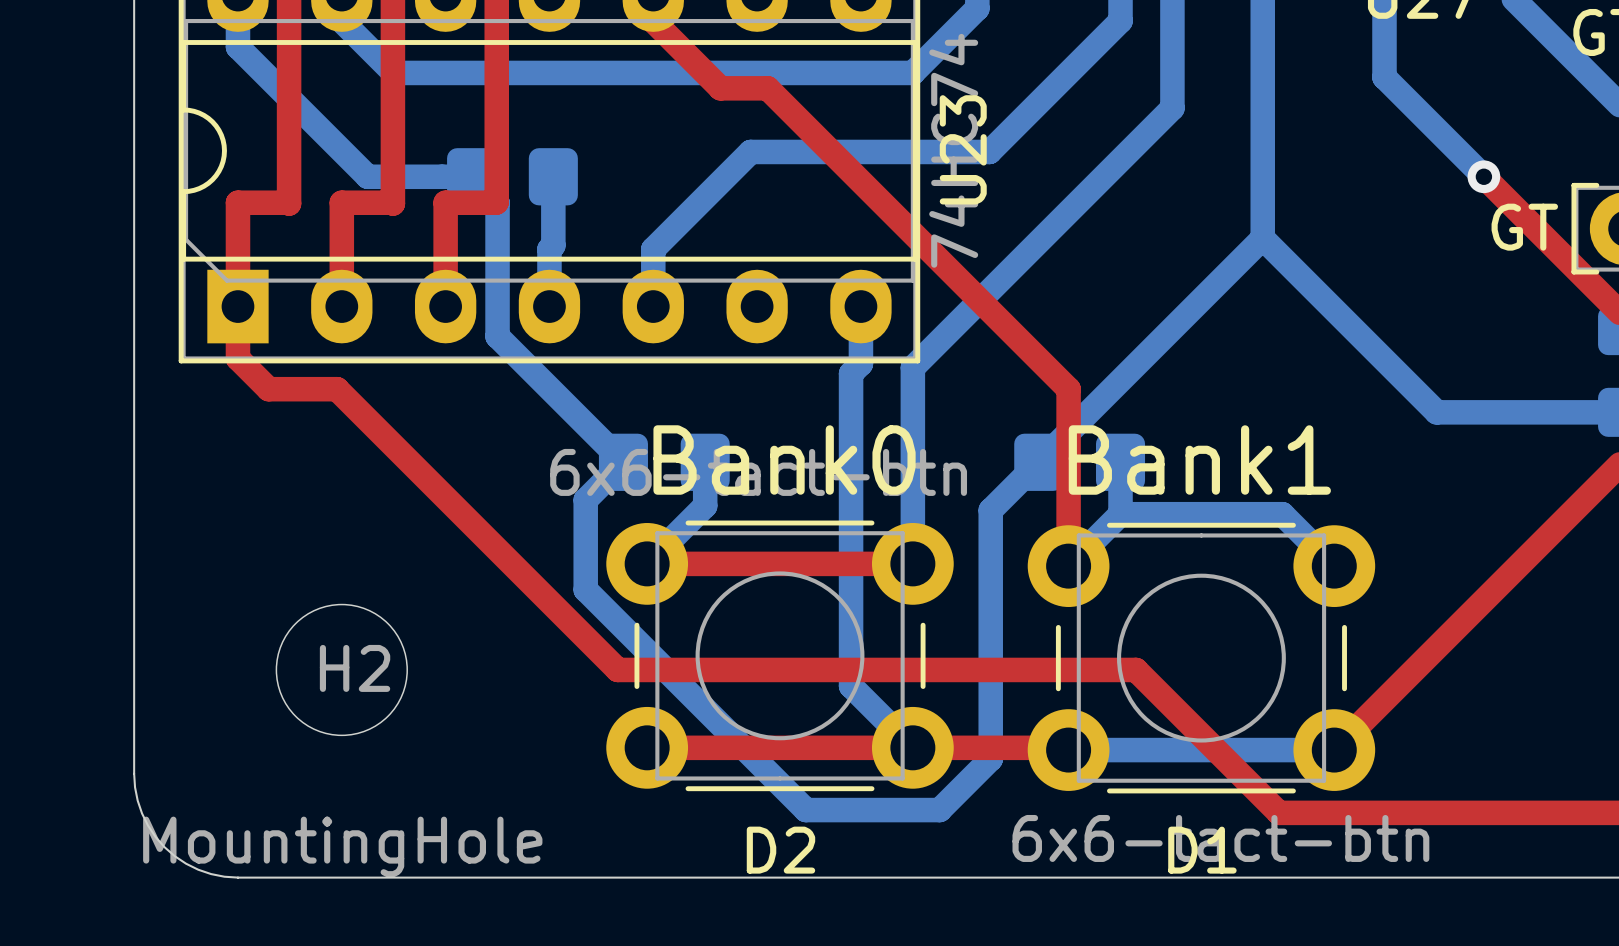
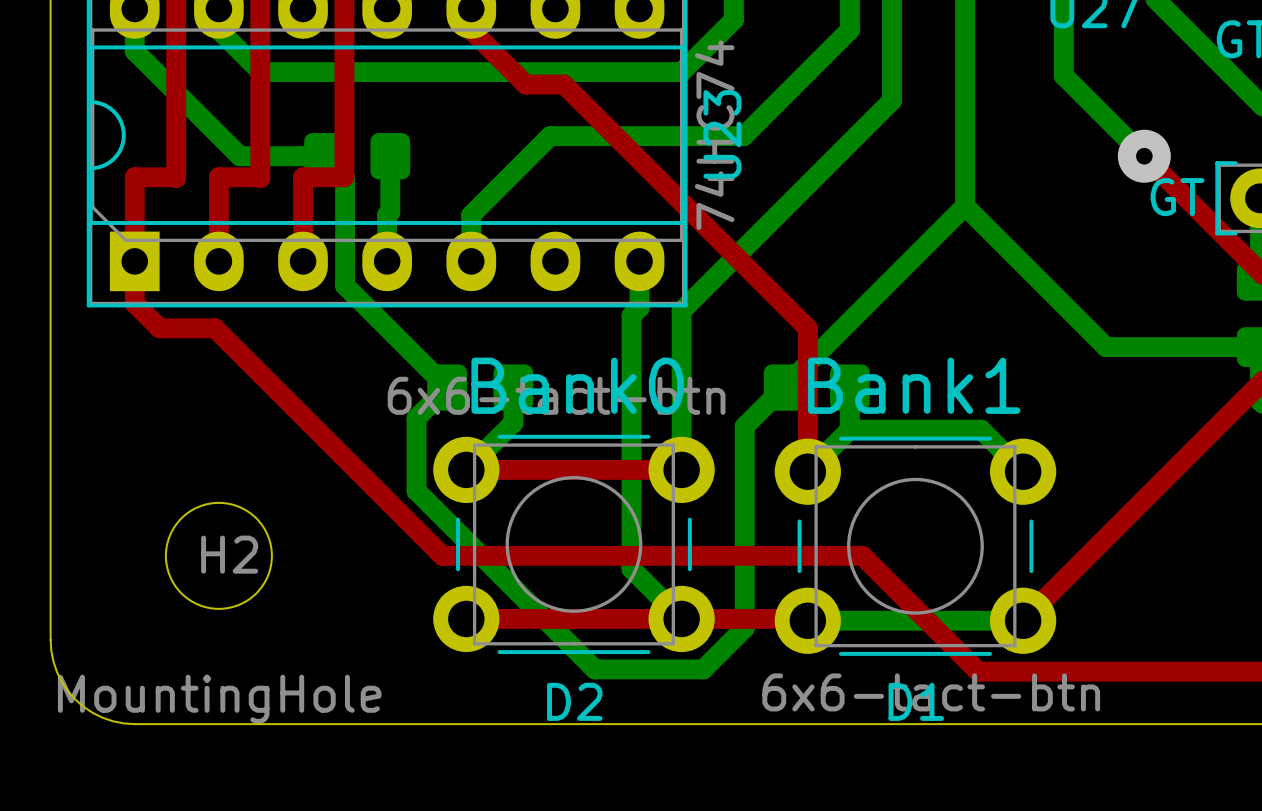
via size: [1467, 160, 1501, 194] -> [1117, 129, 1171, 183]

